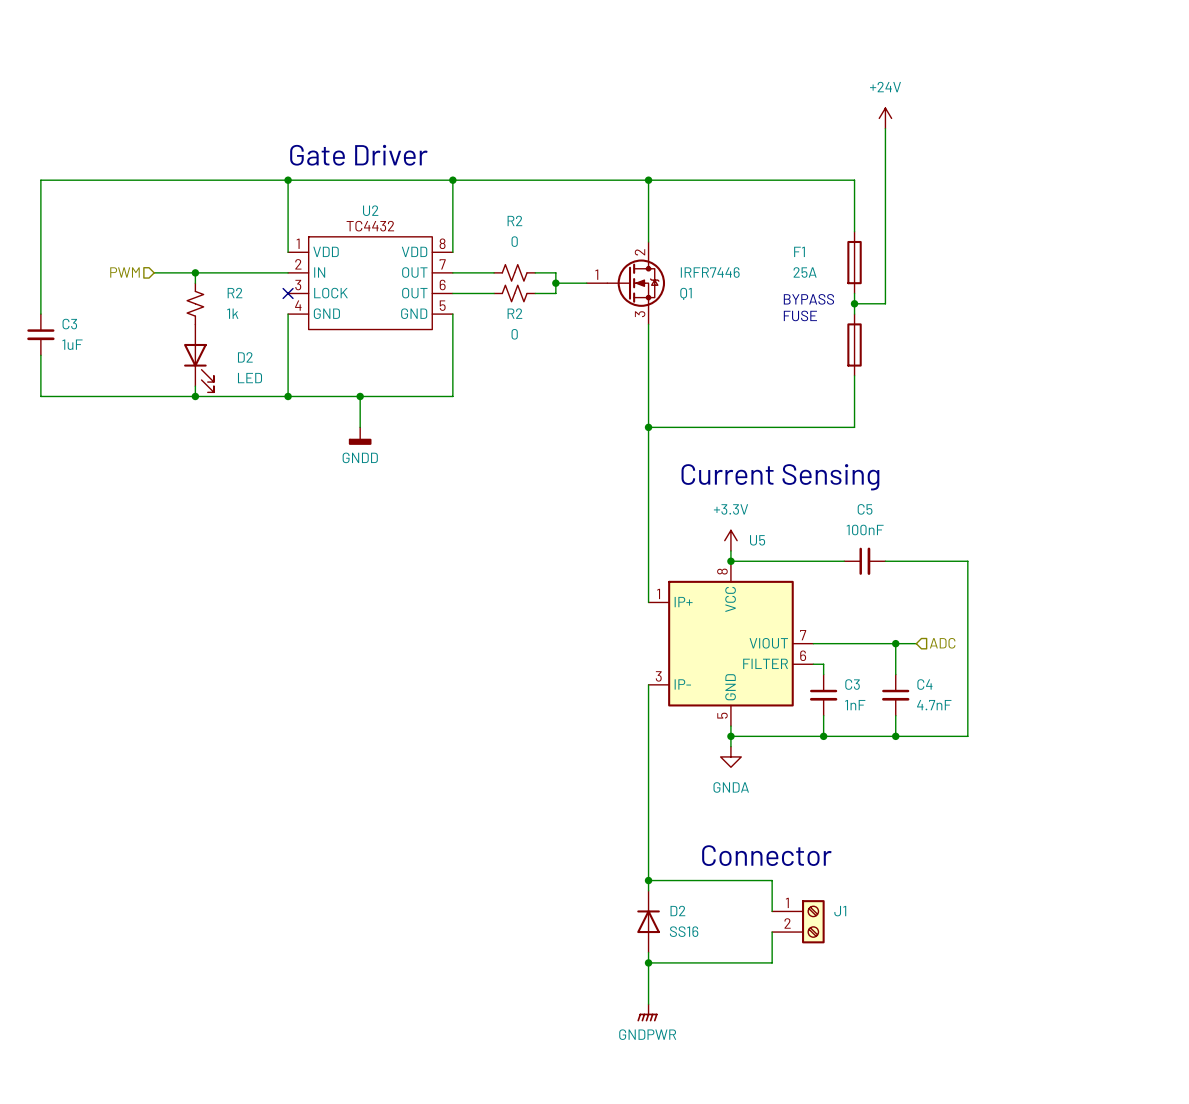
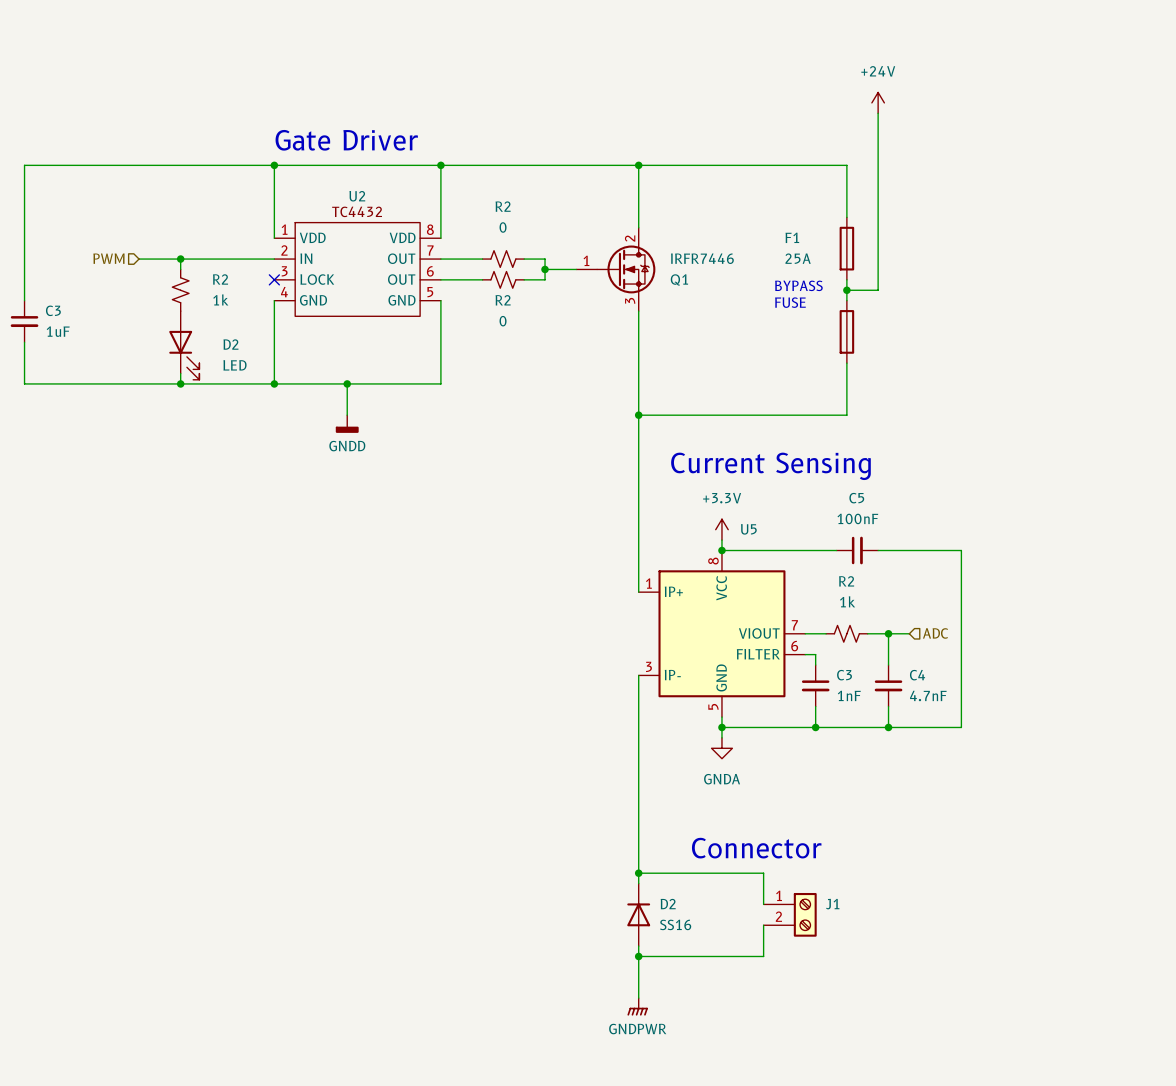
R2: none -> 1k (846, 633)

